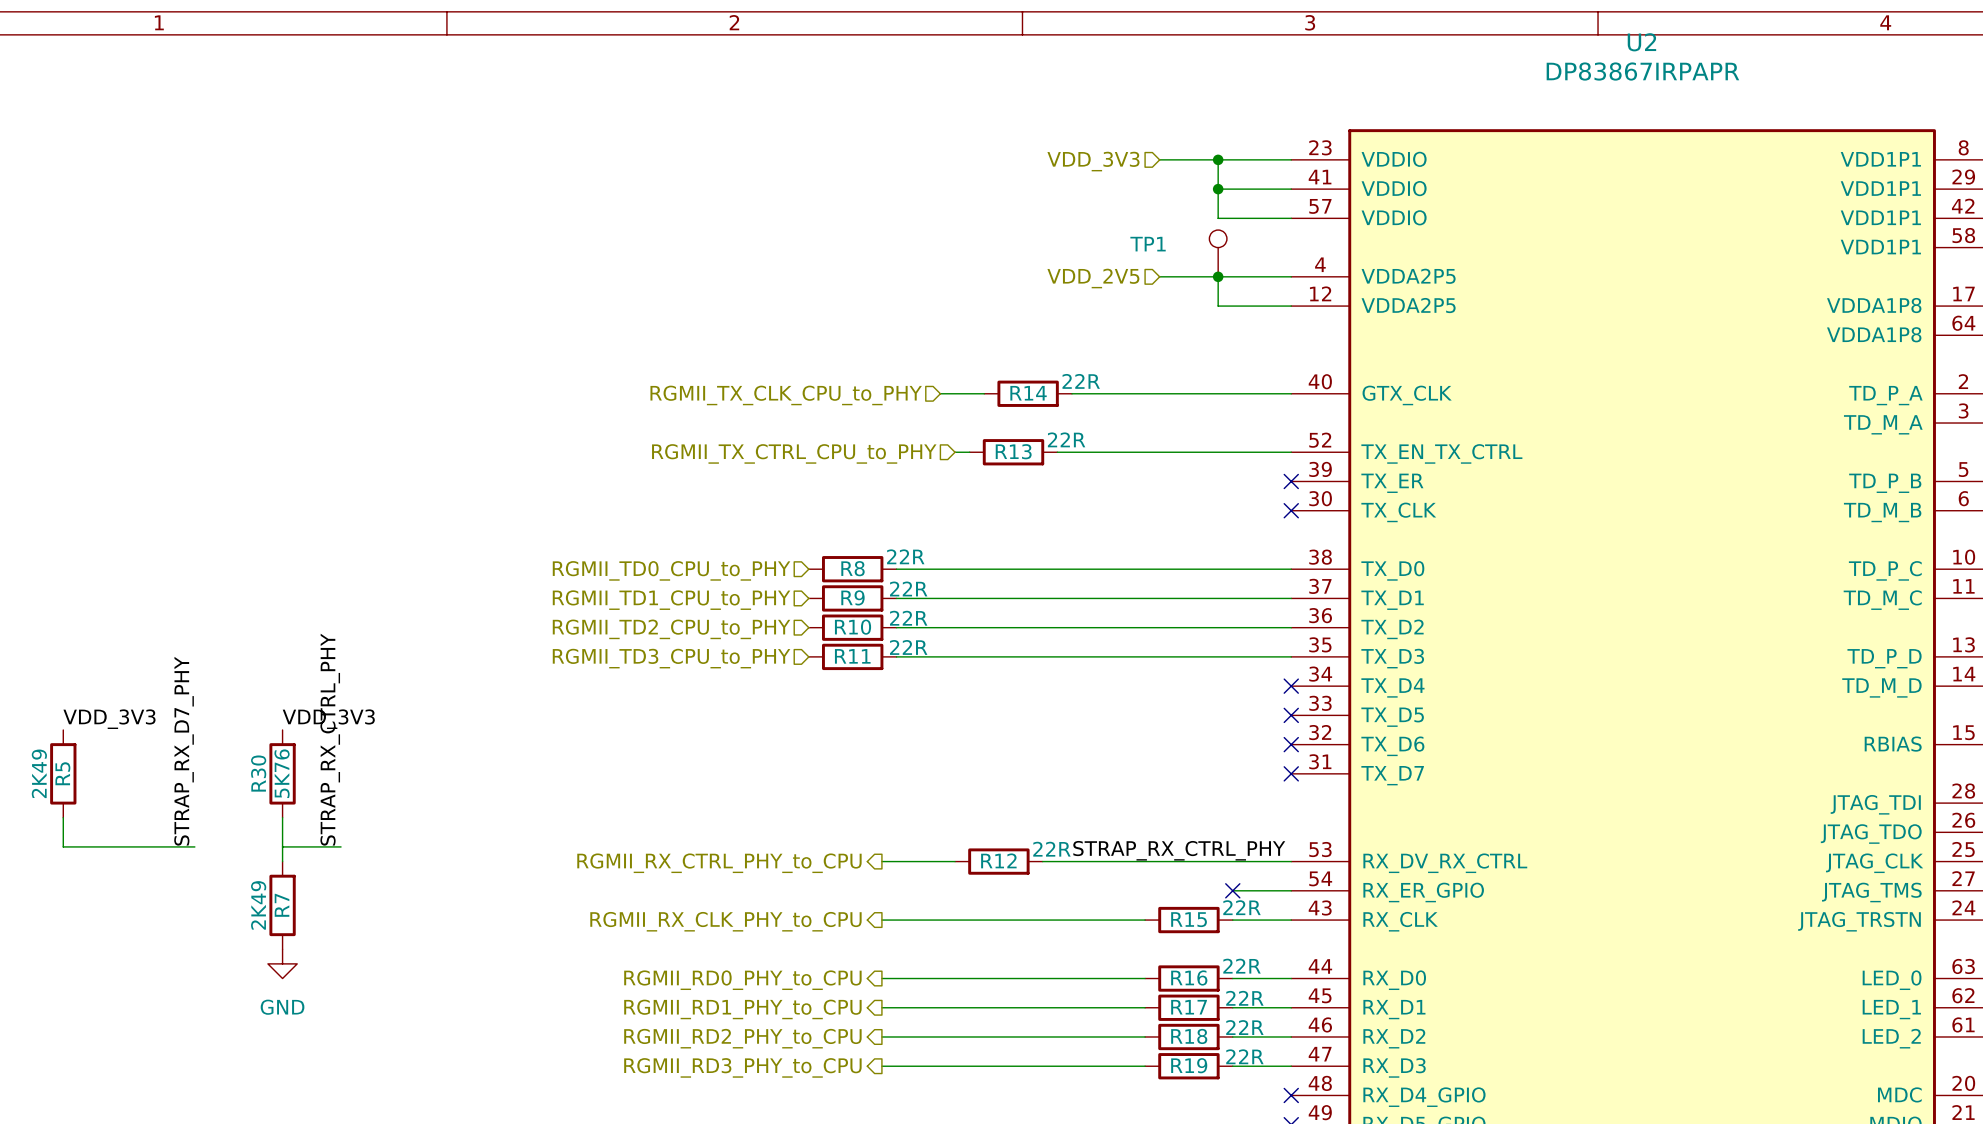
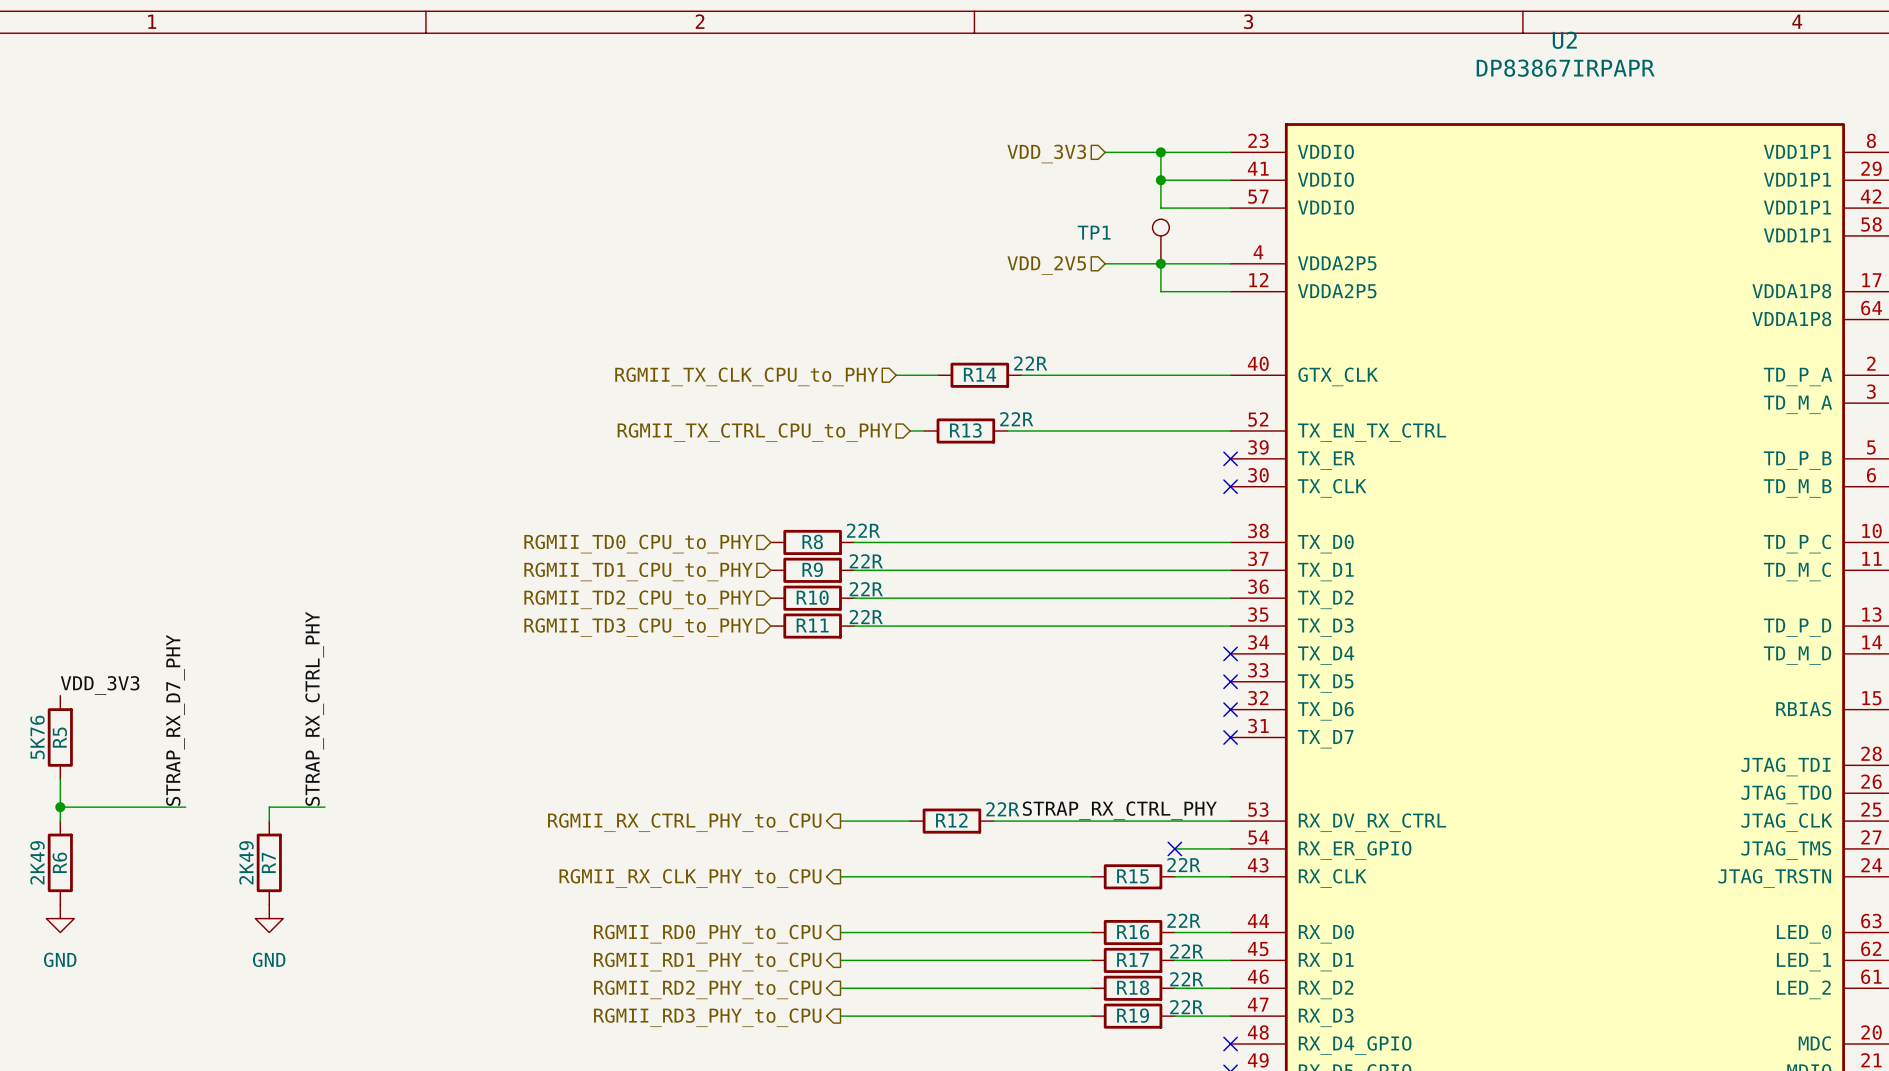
label: VDD_3V3 (328, 719) -> none
R5 value: 2K49 (39, 773) -> 5K76 (37, 737)
R30: 5K76 (282, 773) -> none
wire: (282, 817) (282, 846) -> none
wire: none -> (60, 807) (60, 821)
junction: none -> (60, 807)
R6: none -> 2K49 (60, 862)
power symbol: none -> GND (60, 918)

